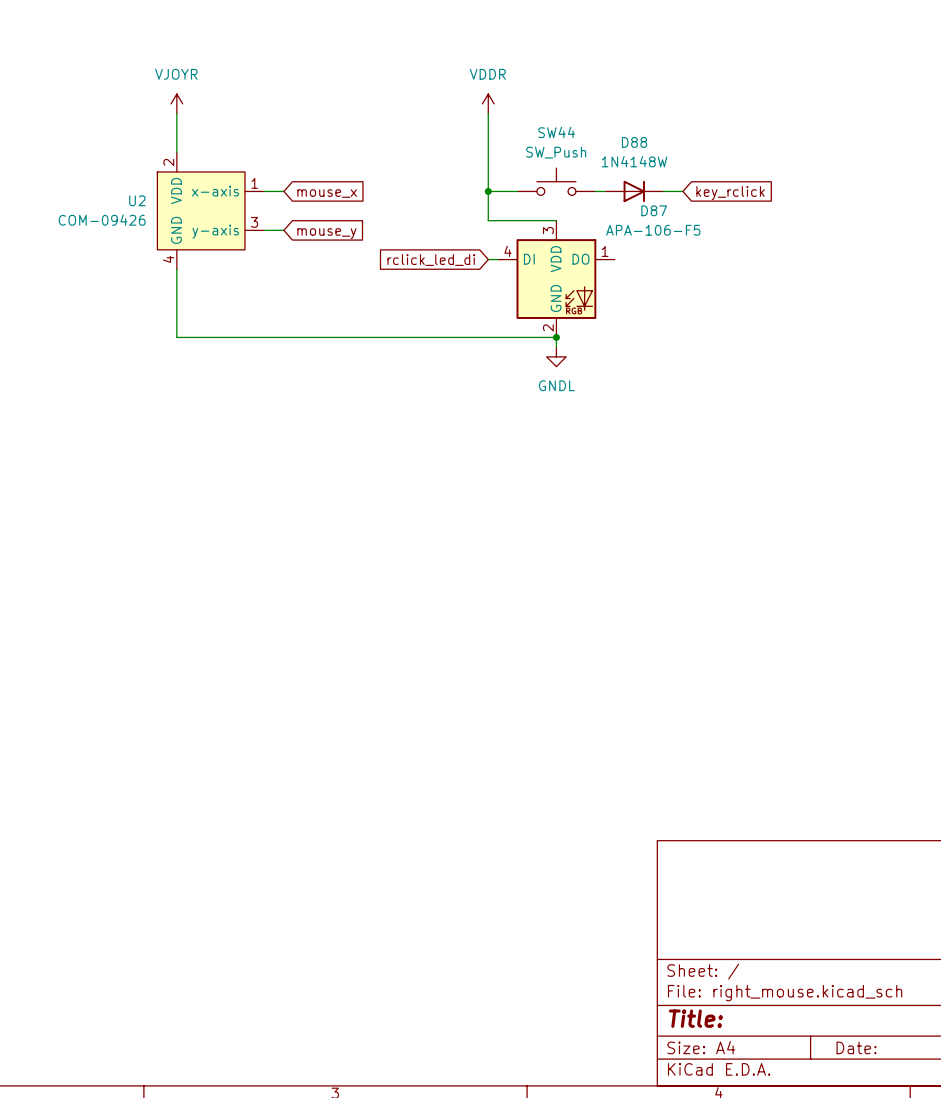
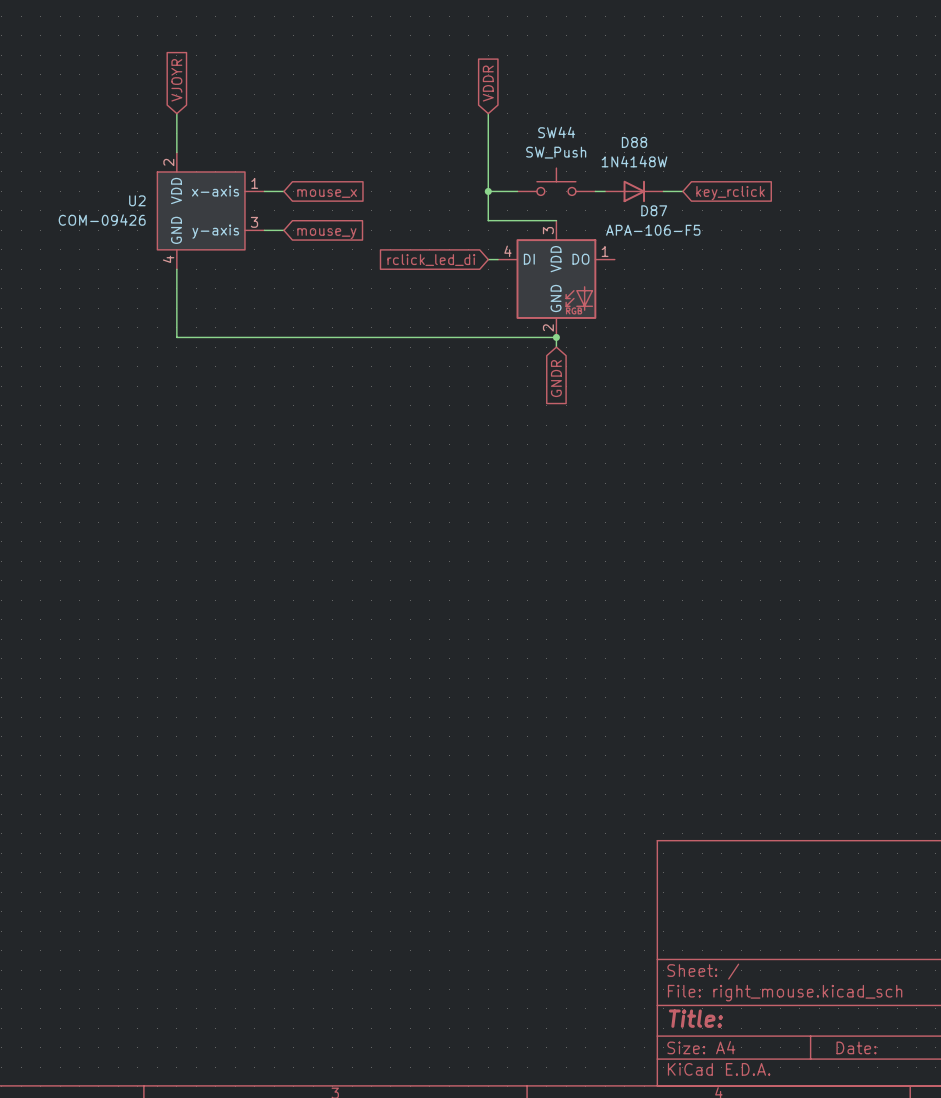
global label: none -> VJOYR (176, 80)
global label: none -> VDDR (488, 83)
power symbol: VJOYR (176, 103) -> none
power symbol: VDDR (488, 103) -> none
power symbol: GNDL (556, 356) -> none
global label: none -> GNDR (556, 378)

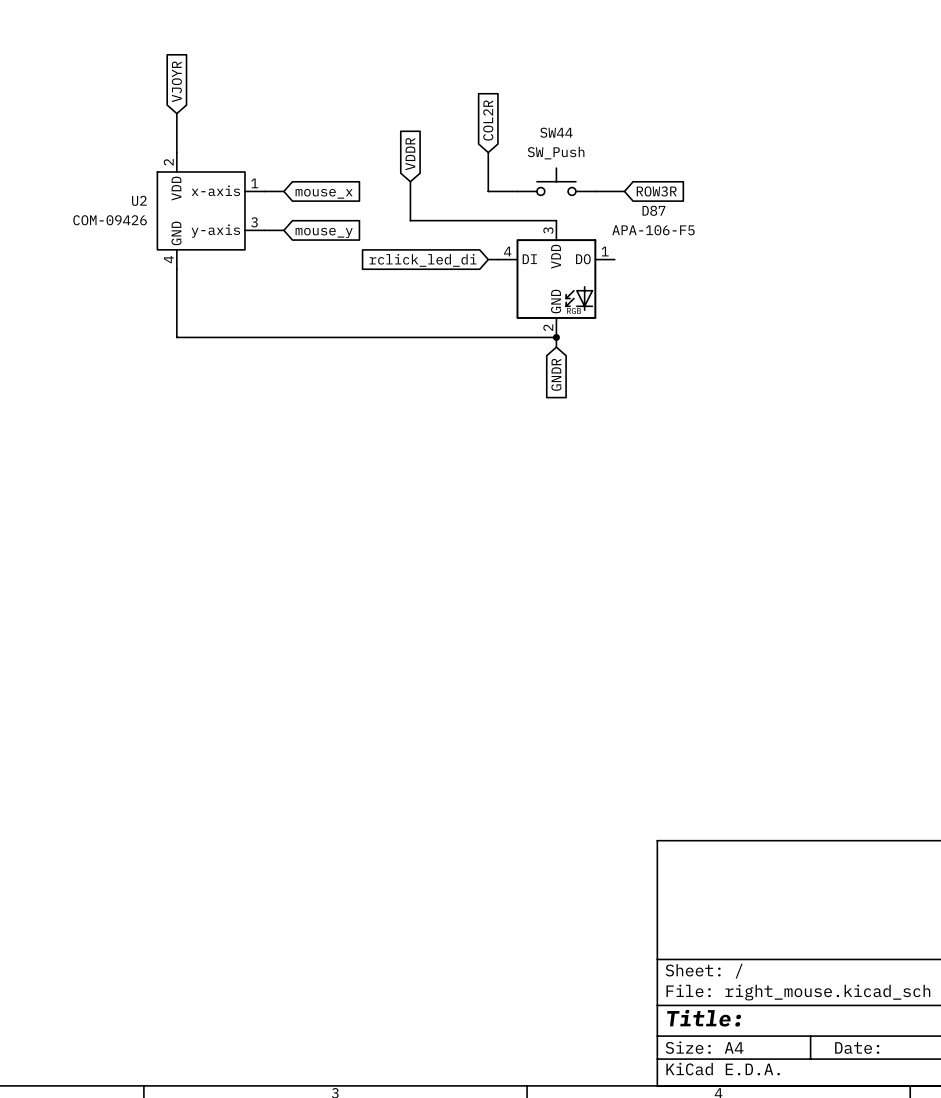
global label position: VDDR (488, 83) -> VDDR (410, 154)
wire: (488, 113) (488, 152) -> none
global label: none -> COL2R (488, 120)
wire: (488, 191) (488, 220) -> (410, 181) (410, 220) (488, 220)
junction: (488, 191) -> none
D88: 1N4148W (634, 191) -> none
global label: none -> ROW3R (656, 191)
global label: key_rclick (730, 193) -> none

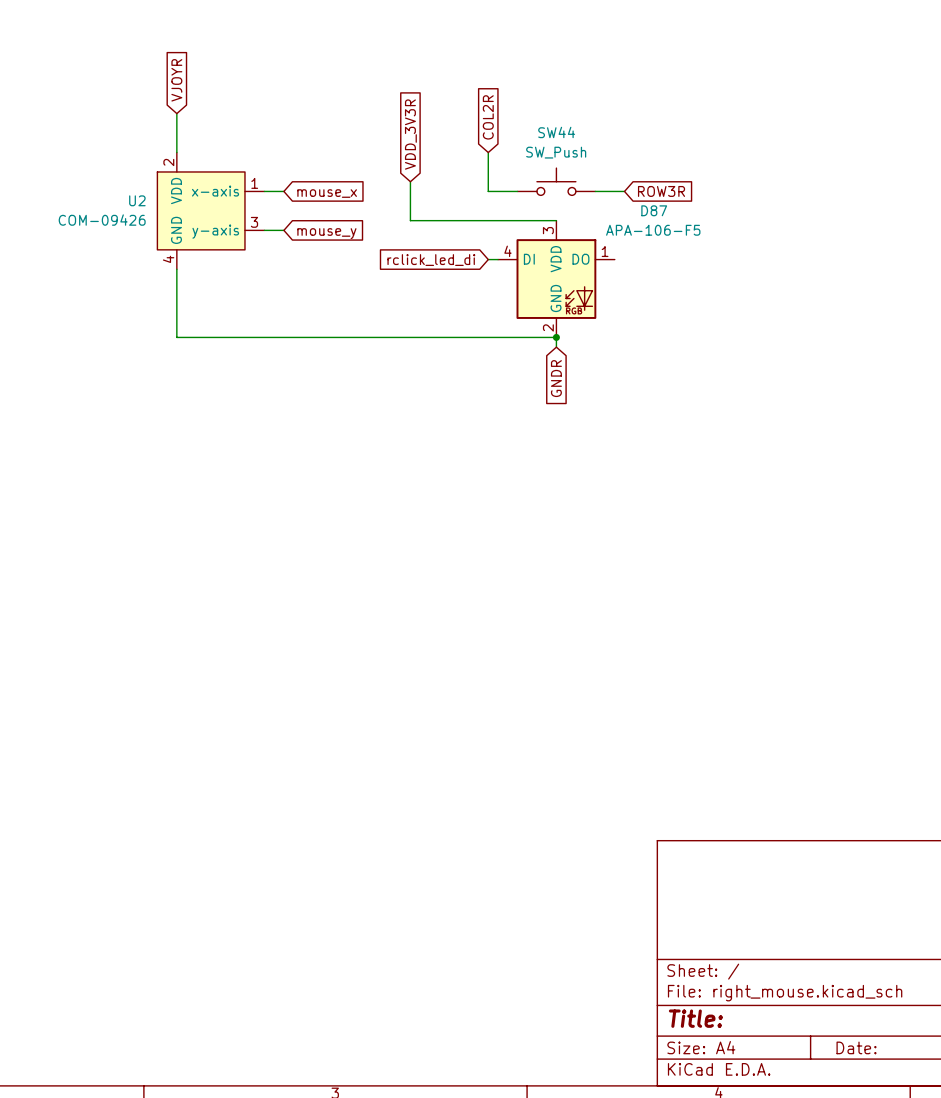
global label: VDDR (410, 154) -> VDD_3V3R (410, 134)

